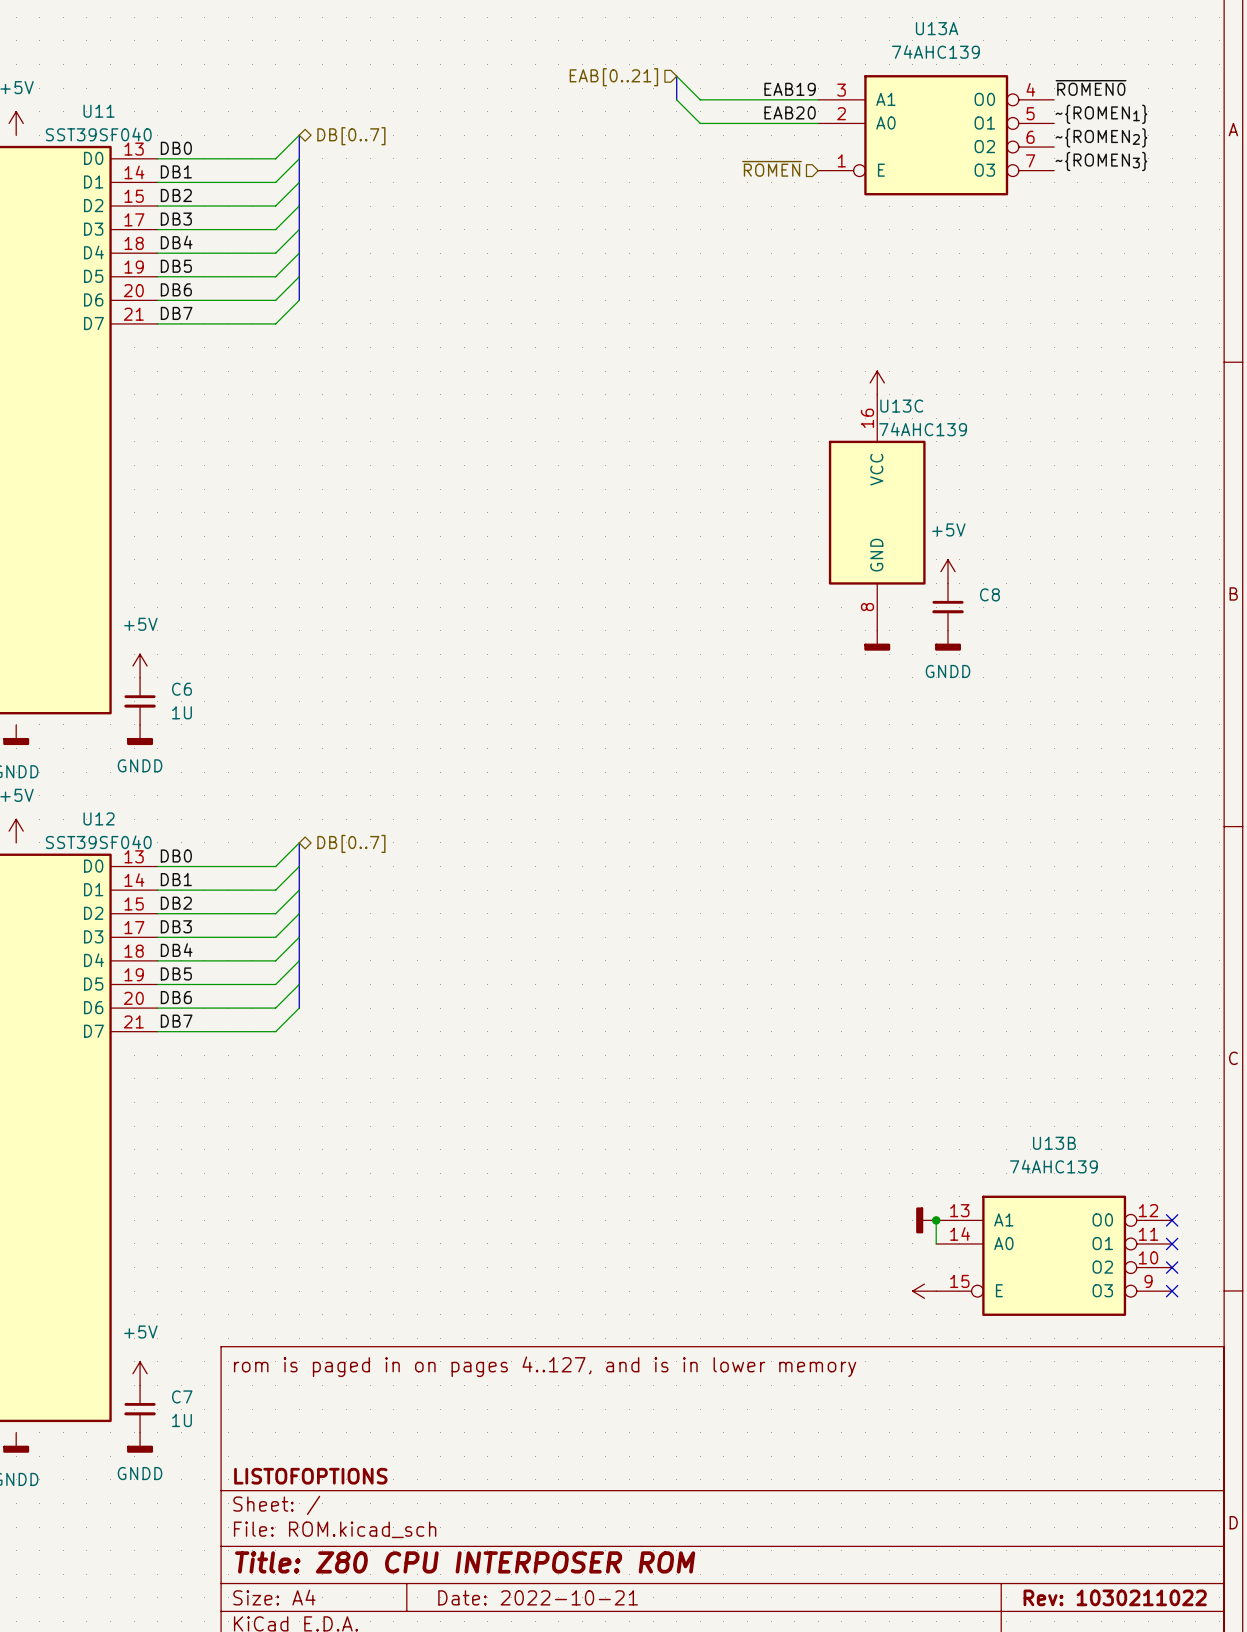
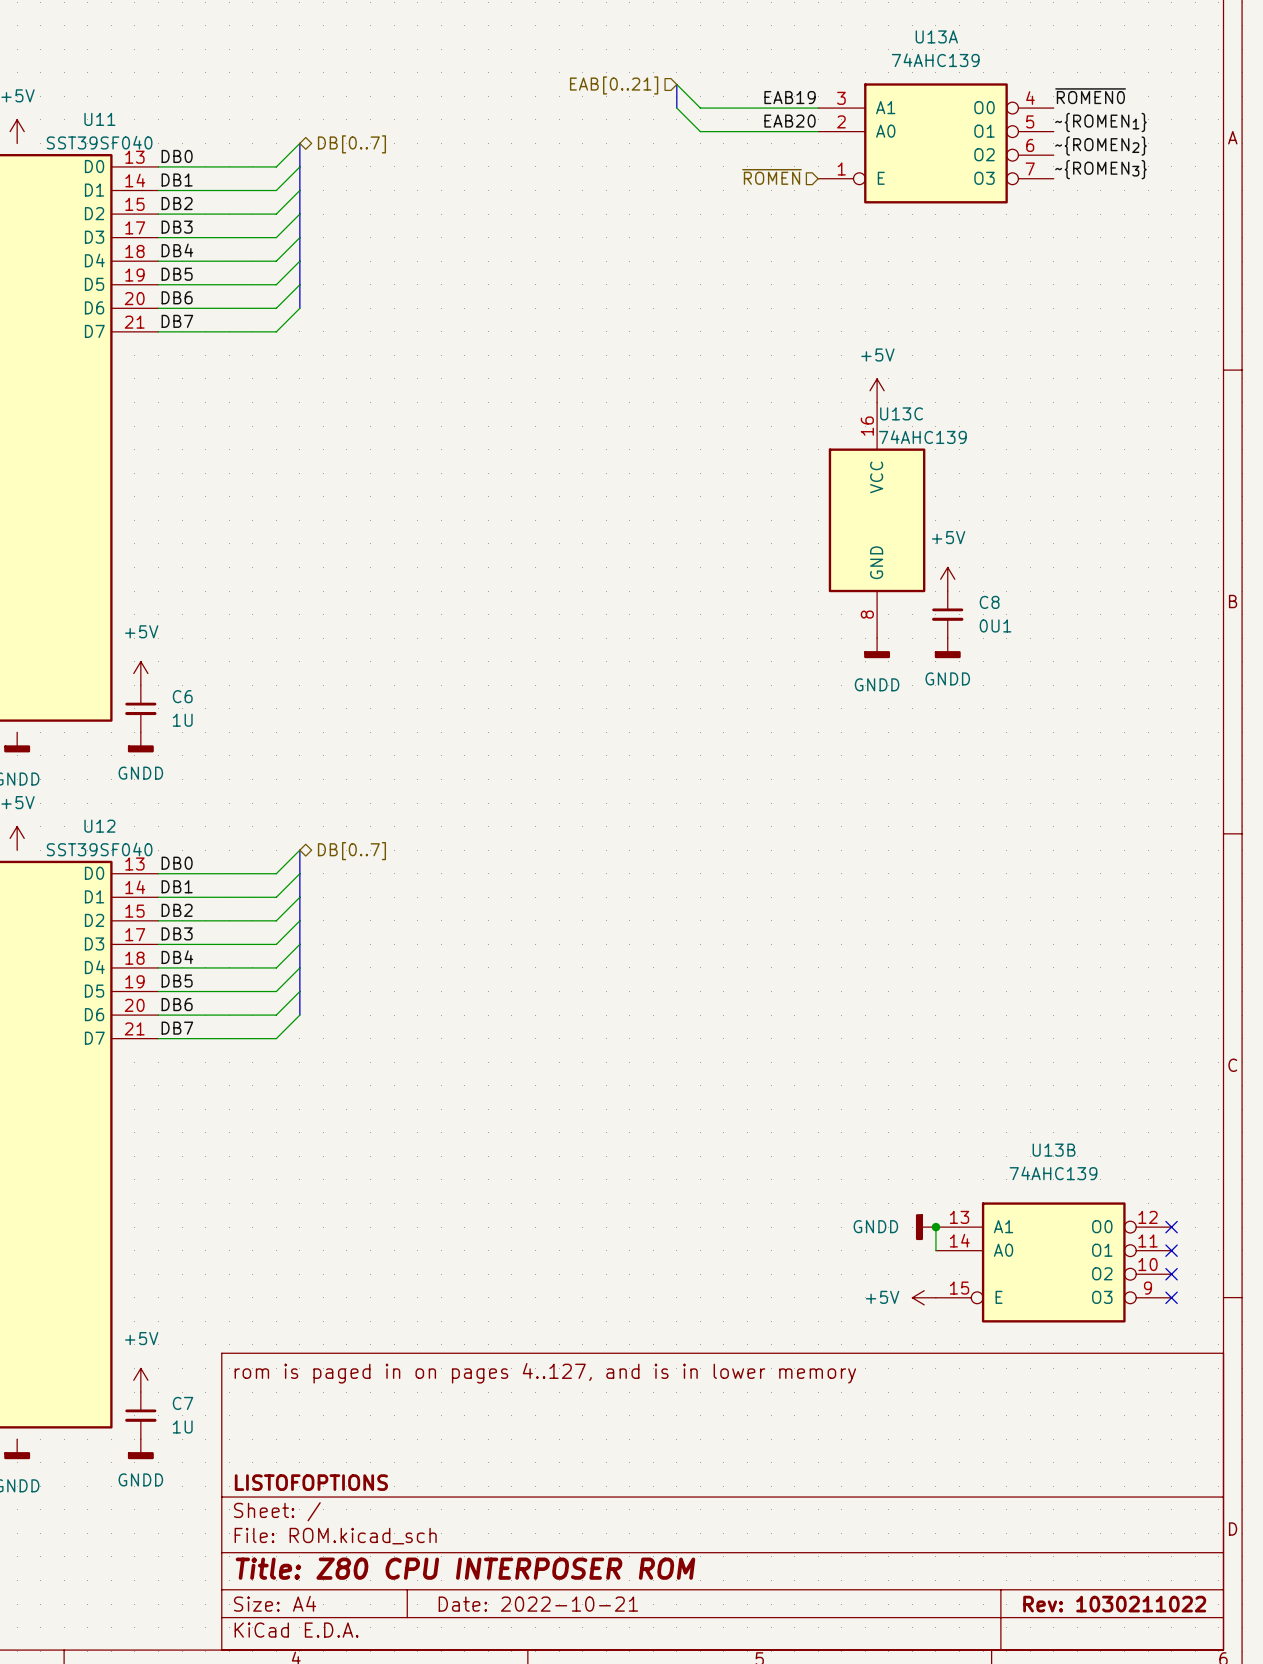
power symbol text: none -> +5V (877, 354)
C8 value: none -> 0U1 (995, 625)
power symbol text: none -> GNDD (877, 684)
power symbol text: none -> GNDD (875, 1226)
power symbol text: none -> +5V (882, 1297)

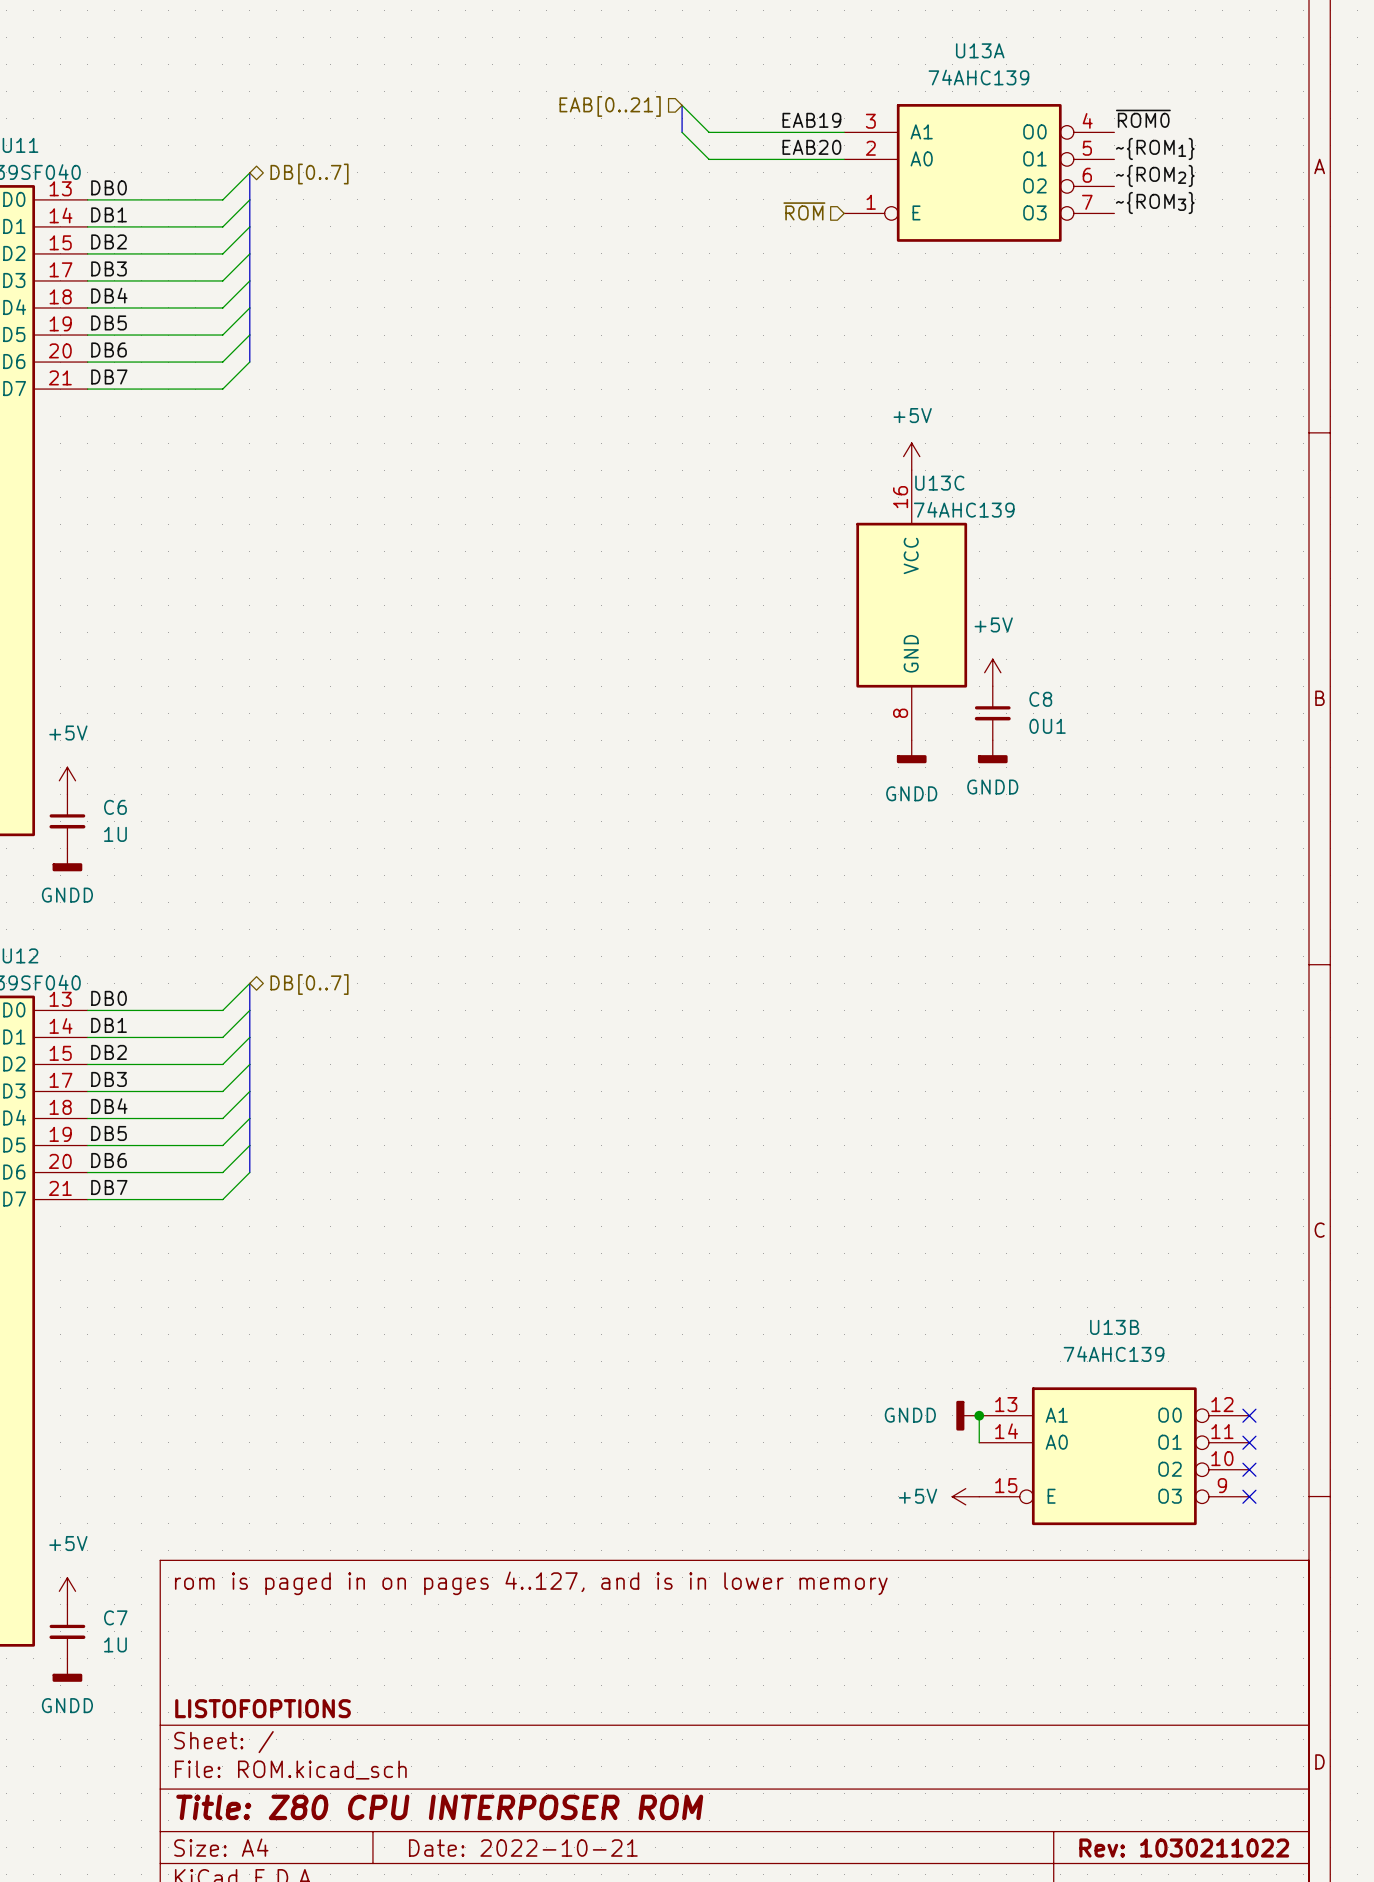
label: ~{ROMEN0} (1090, 96) -> ~{ROM0} (1143, 118)
label: ~{ROMEN1} (1100, 122) -> ~{ROM1} (1155, 148)
label: ~{ROMEN2} (1100, 146) -> ~{ROM2} (1155, 175)
label: ~{ROMEN3} (1100, 169) -> ~{ROM3} (1155, 202)
hierarchical label: ~{ROMEN} (771, 176) -> ~{ROM} (804, 211)

